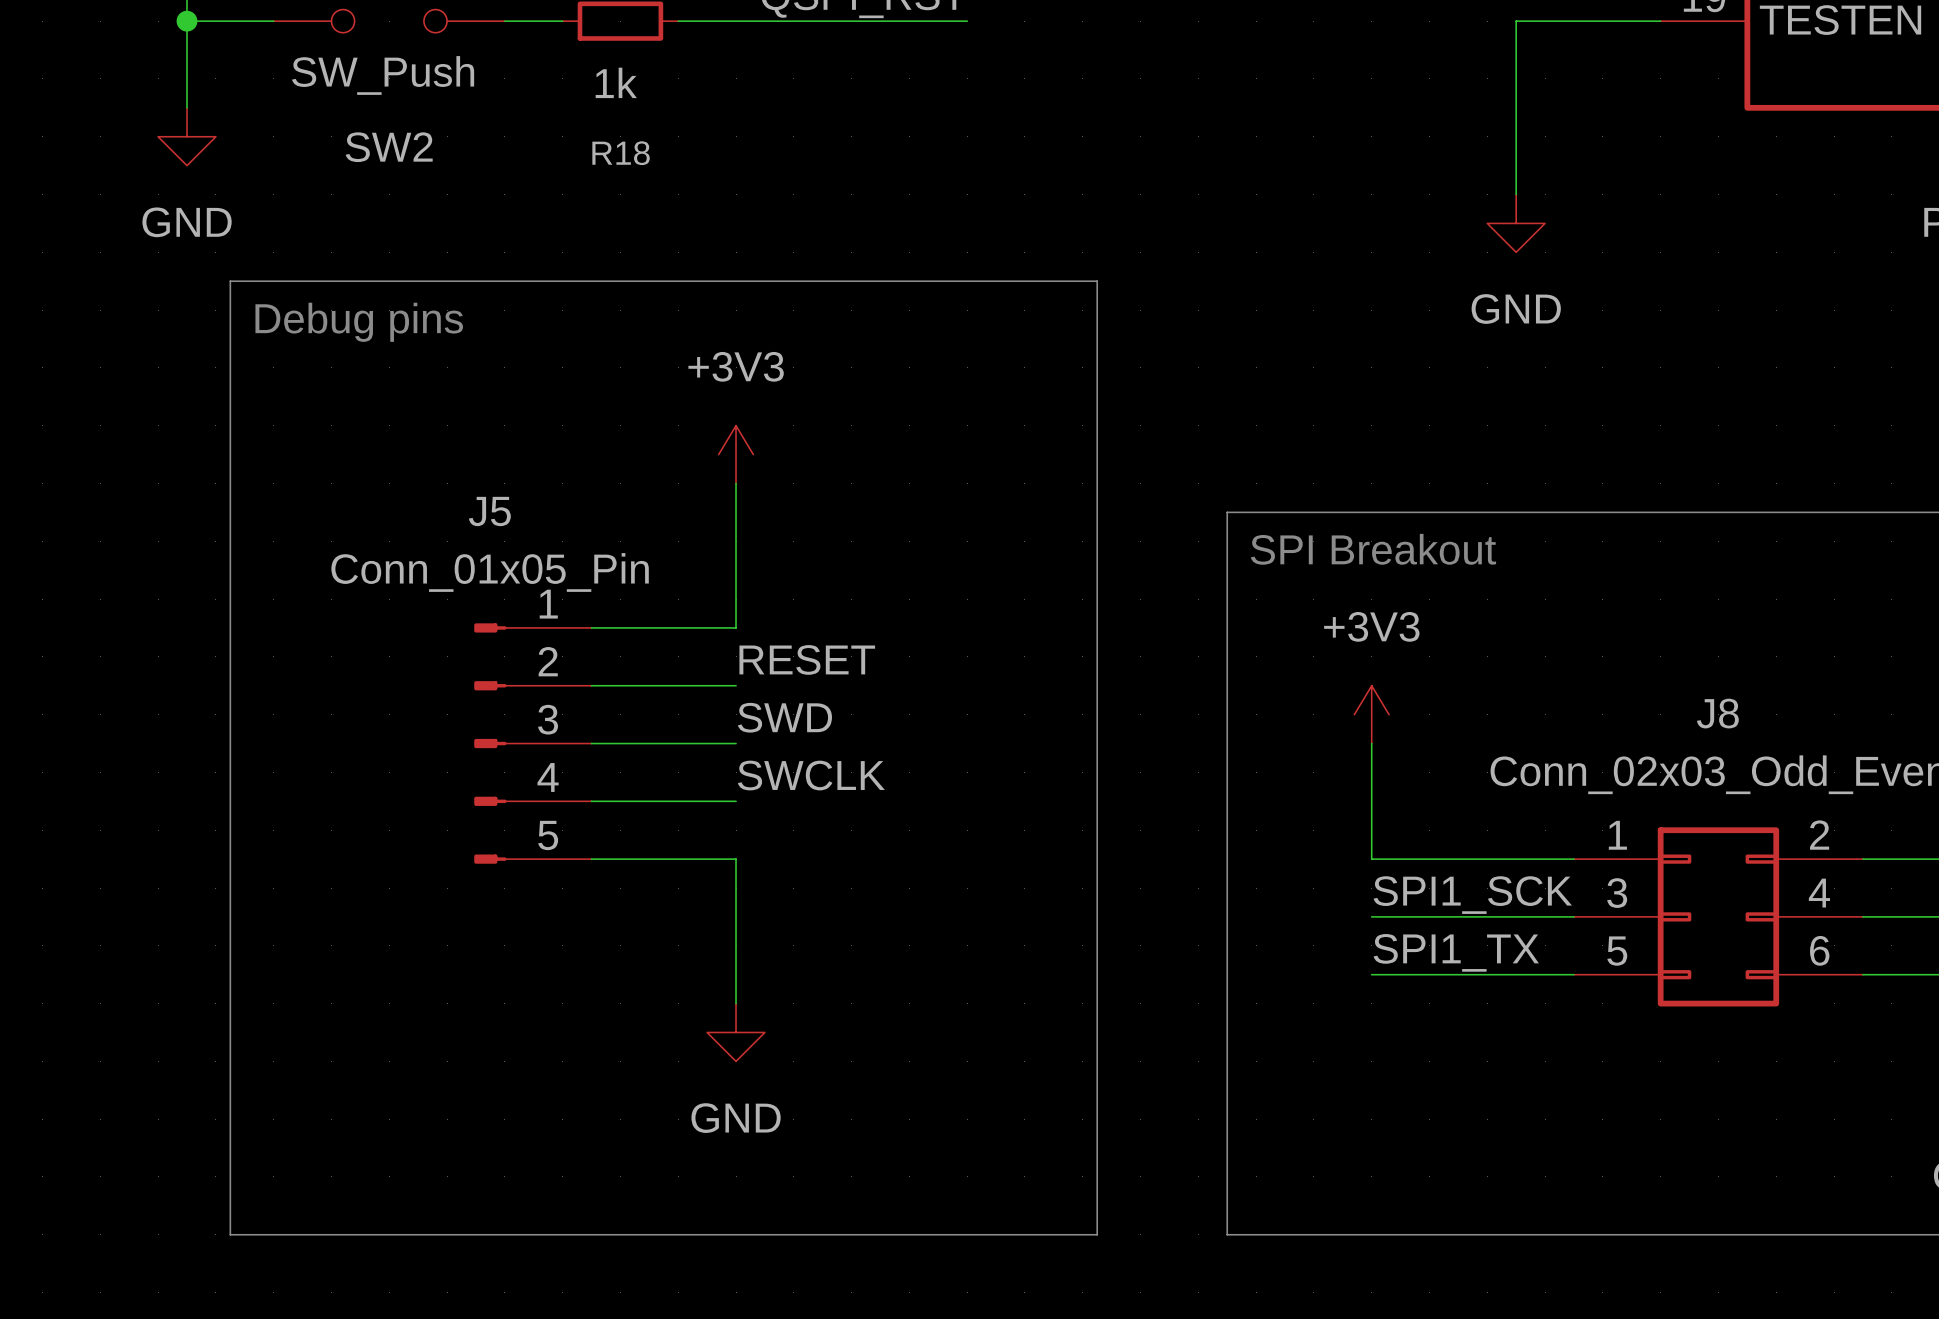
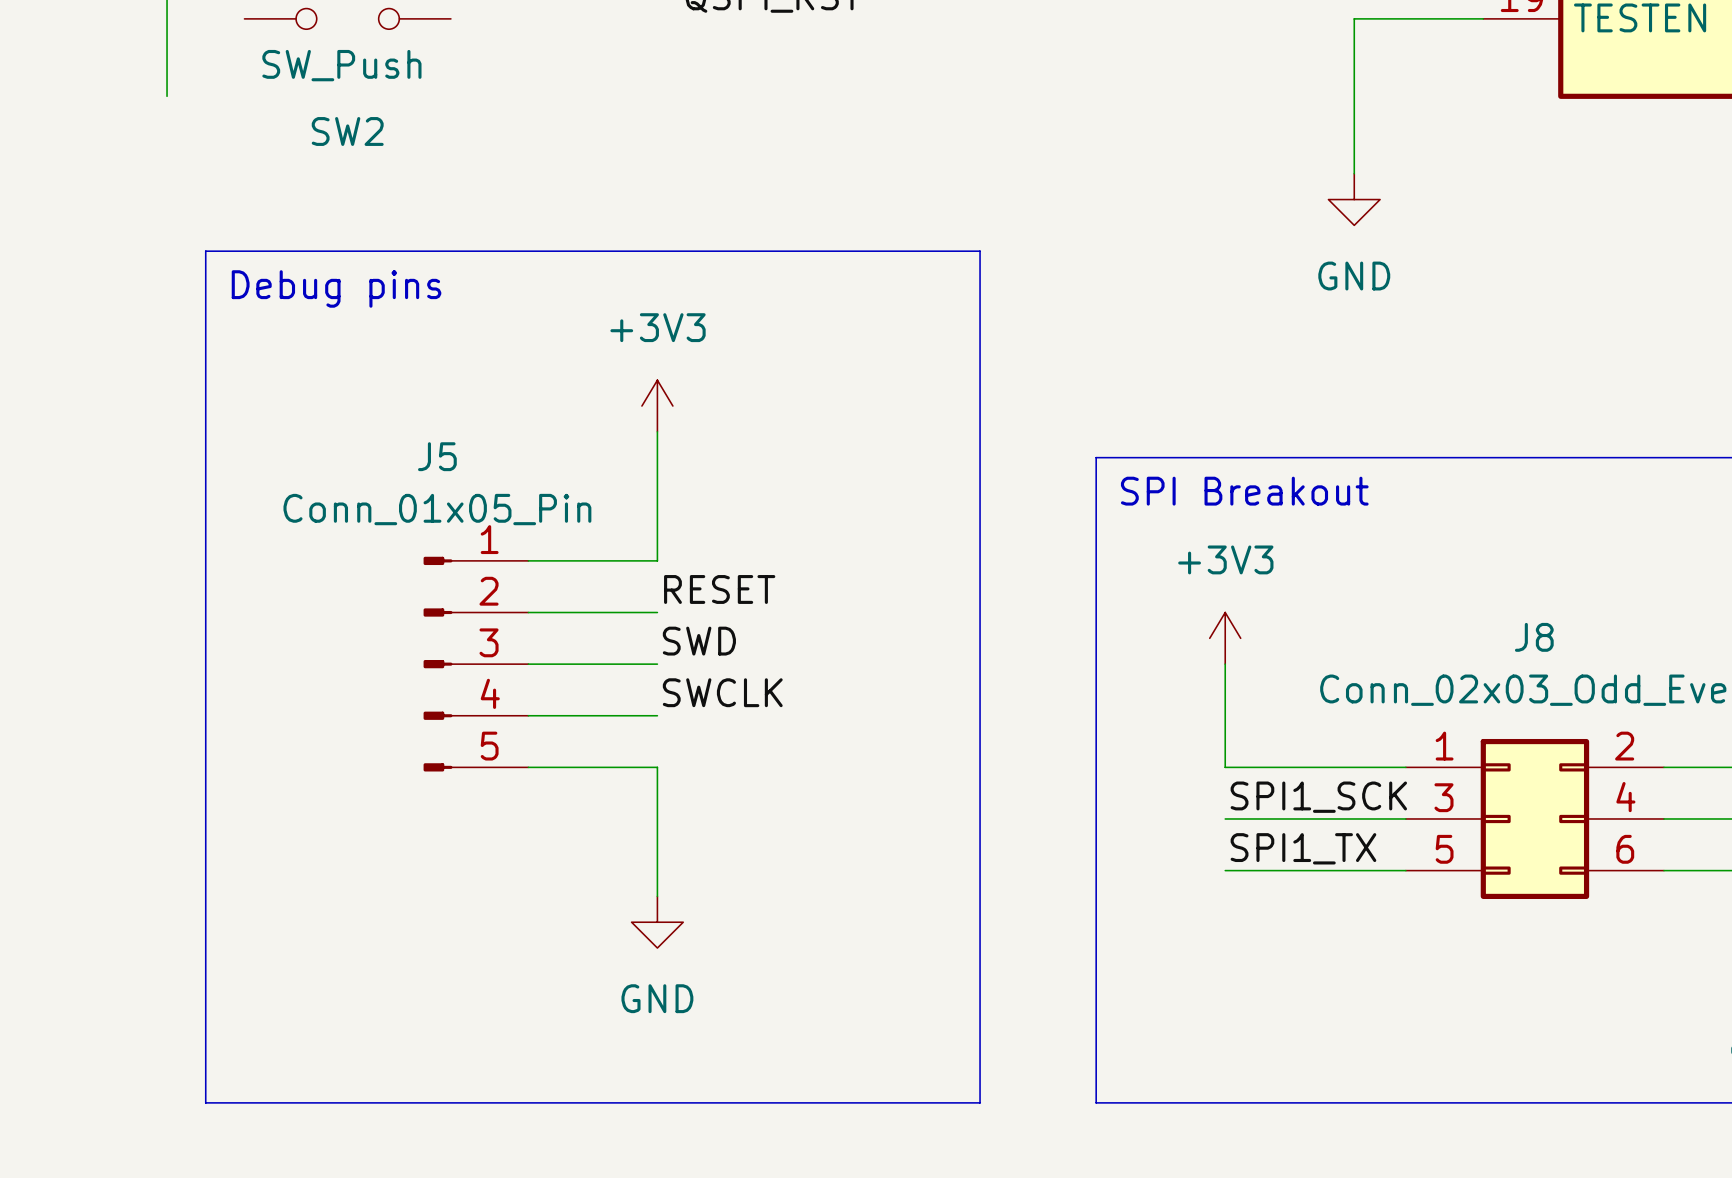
wire: (187, 21) (273, 21) -> none
junction: (187, 21) -> none
wire: (504, 21) (562, 21) -> none
R18: 1k (620, 21) -> none
wire: (678, 21) (967, 21) -> none
power symbol: GND (187, 136) -> none

